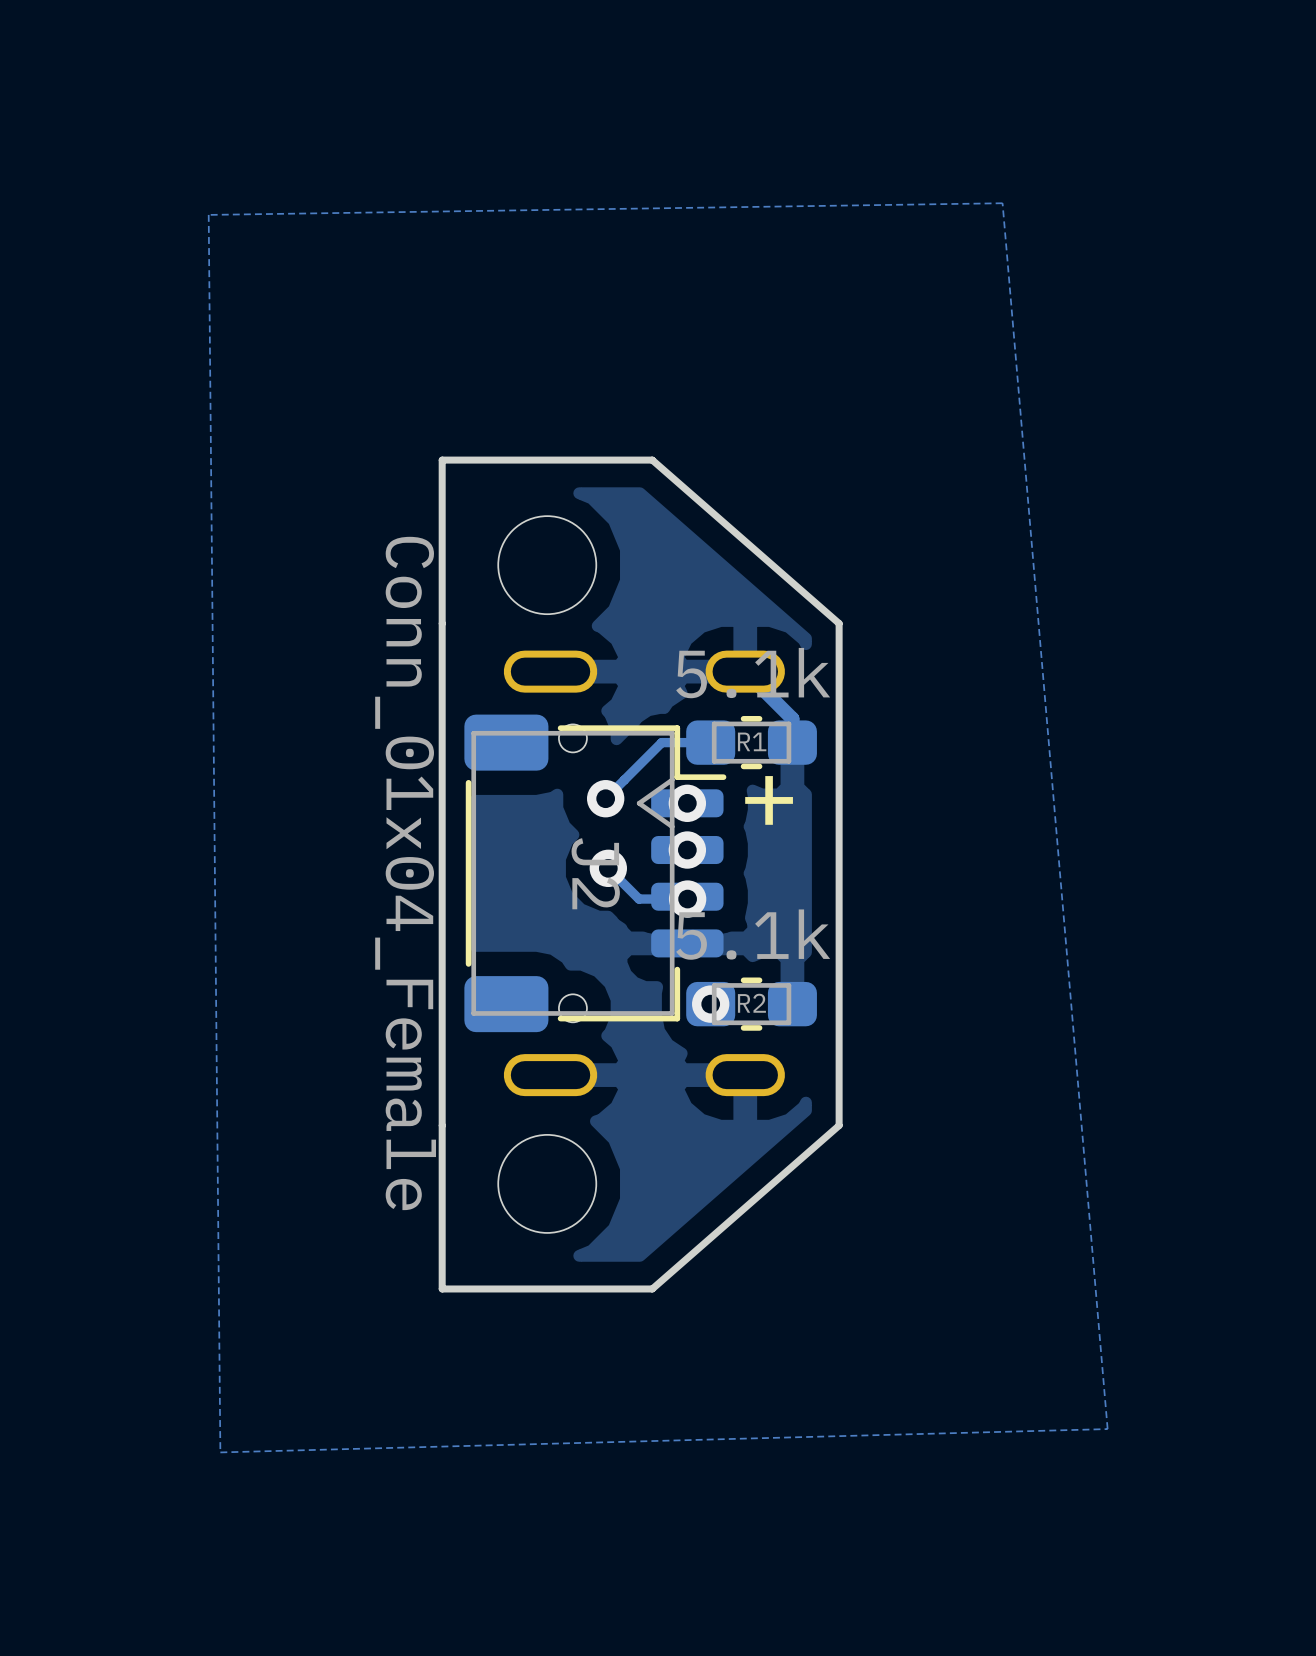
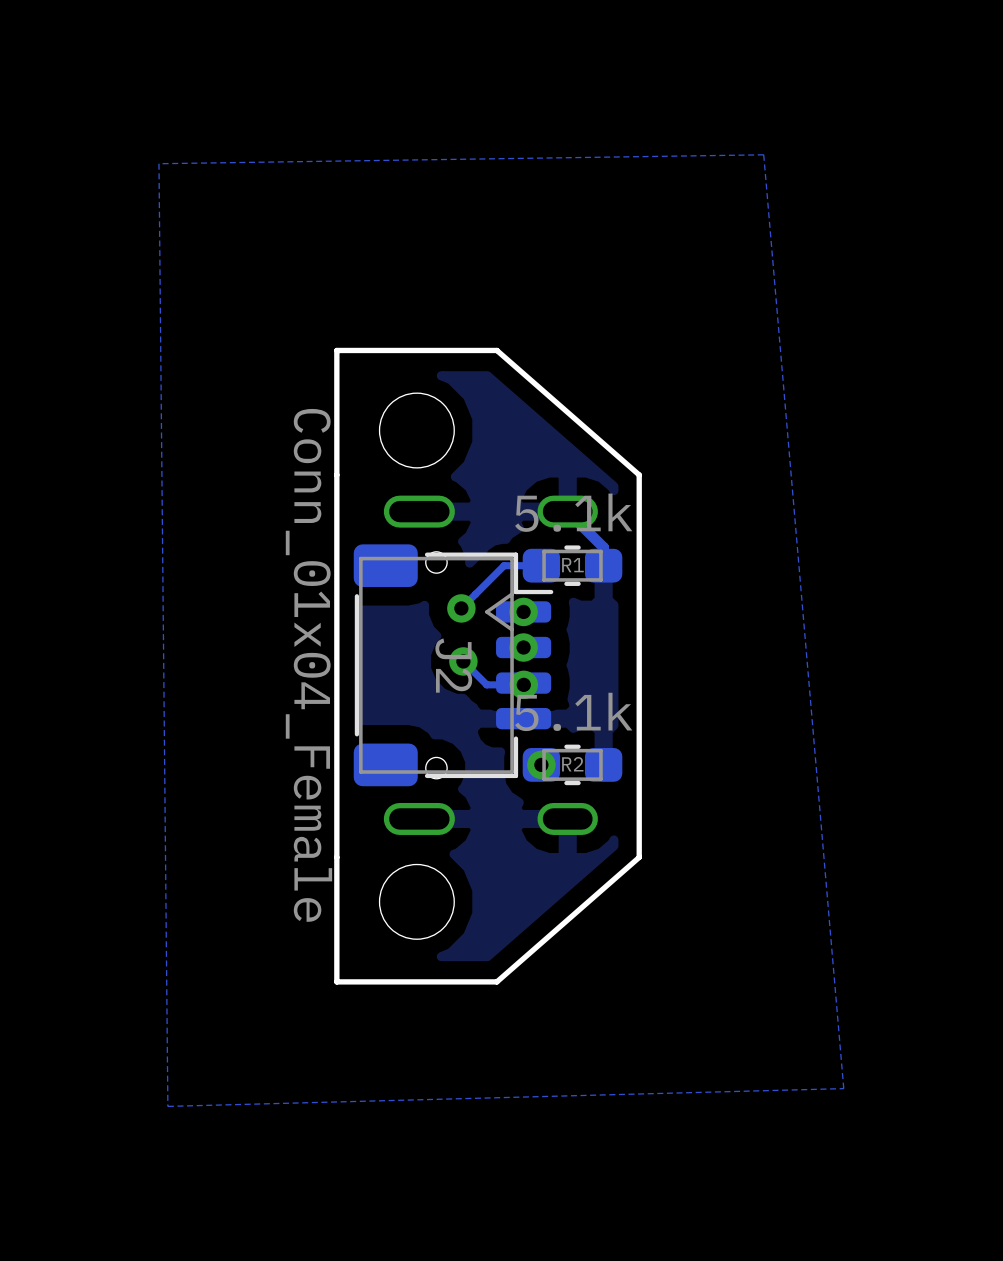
text: + (769, 800) -> none

